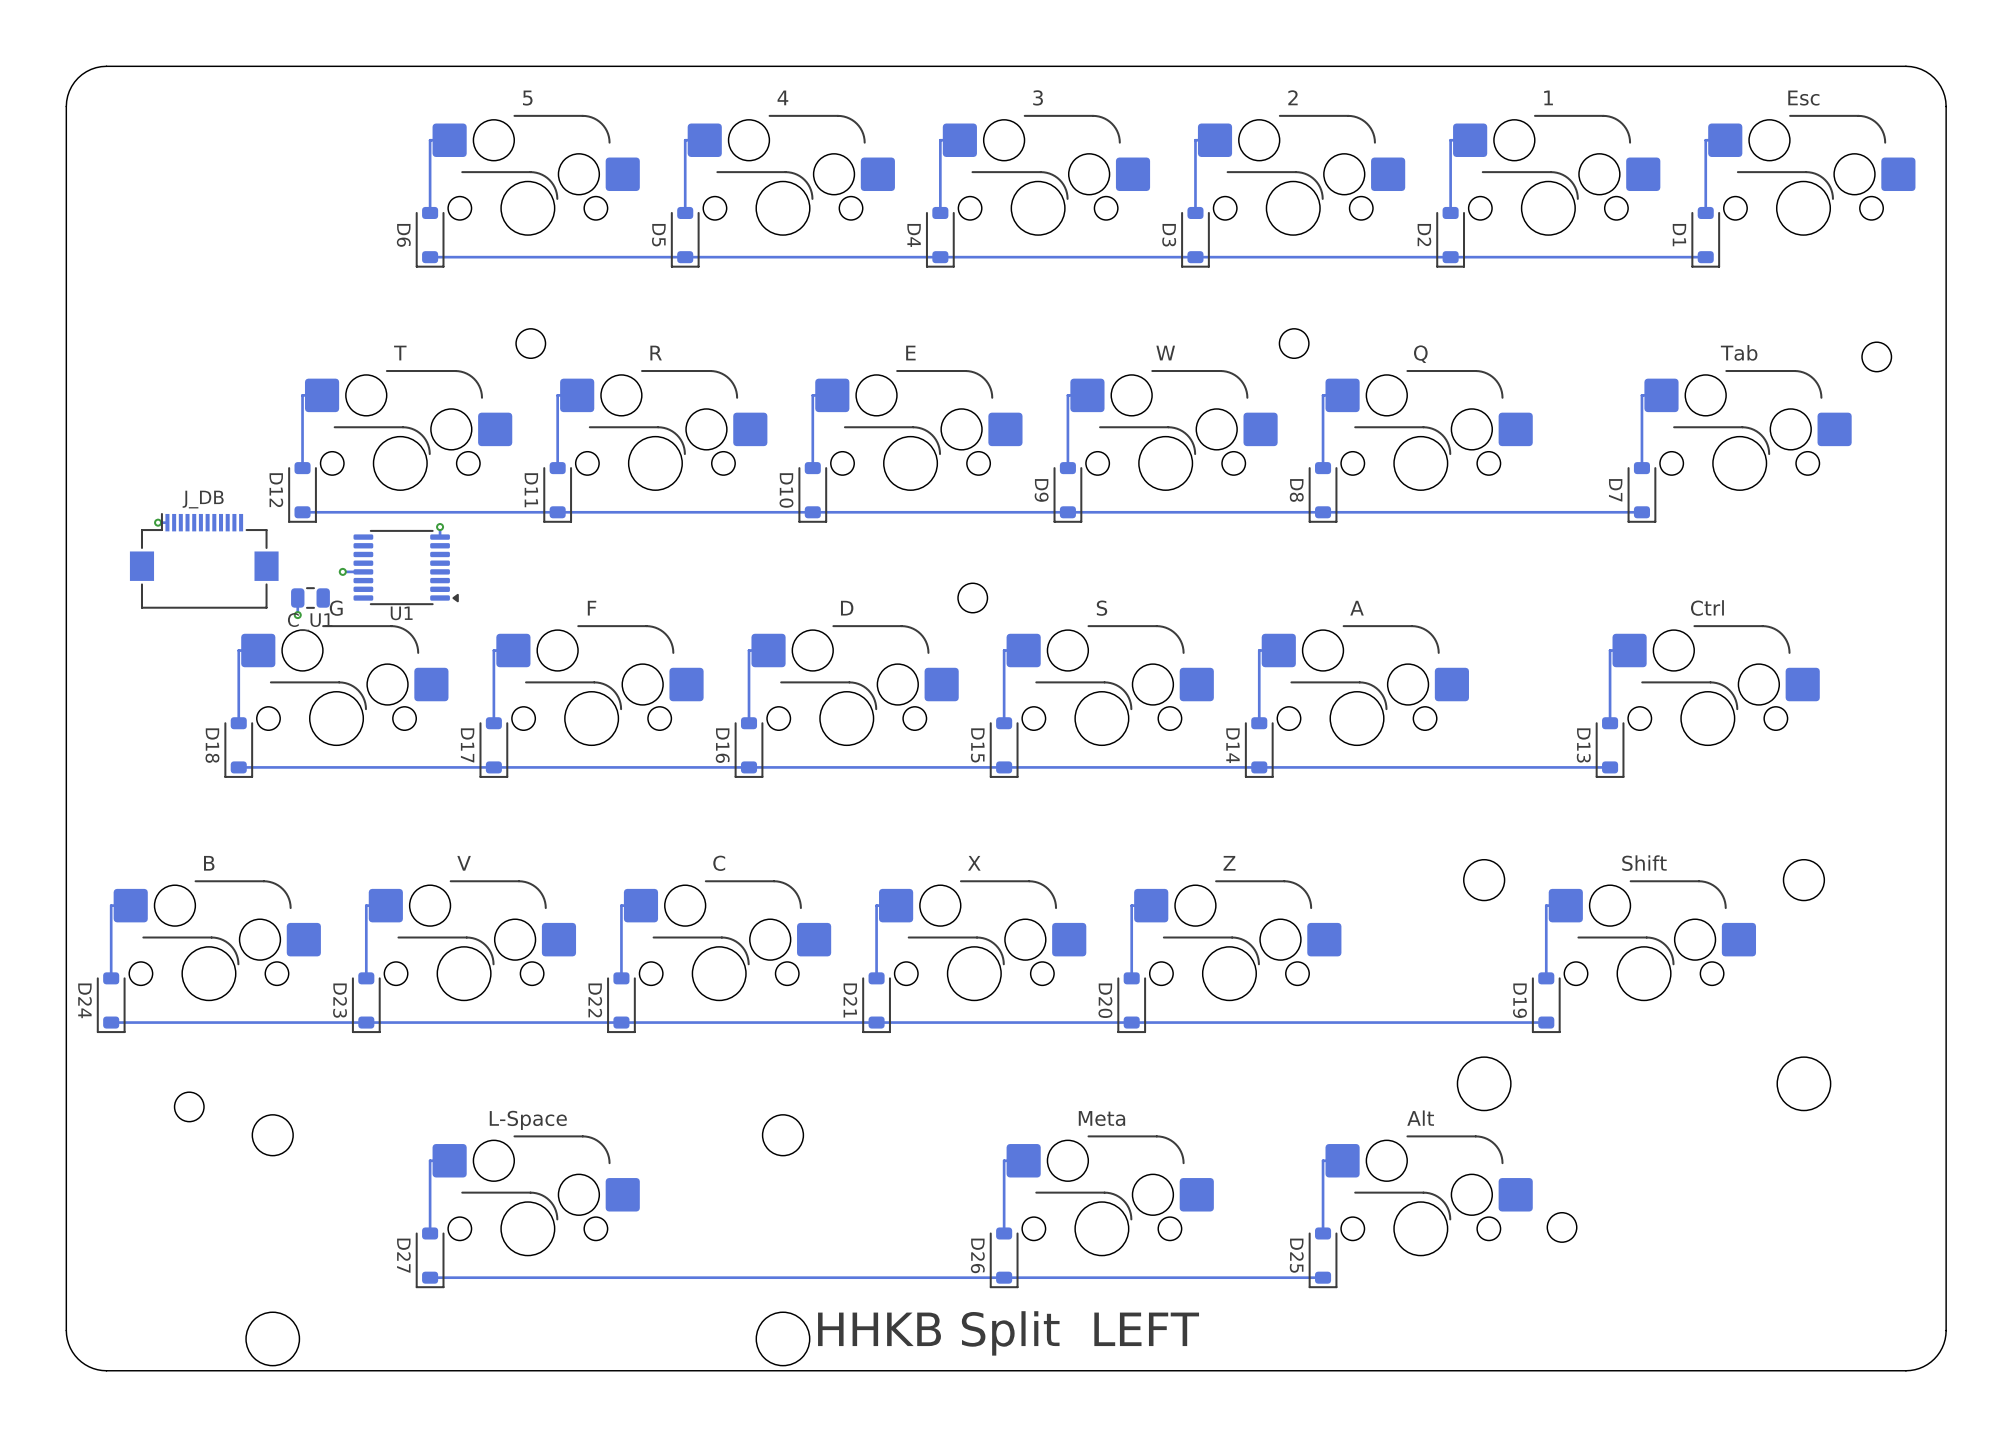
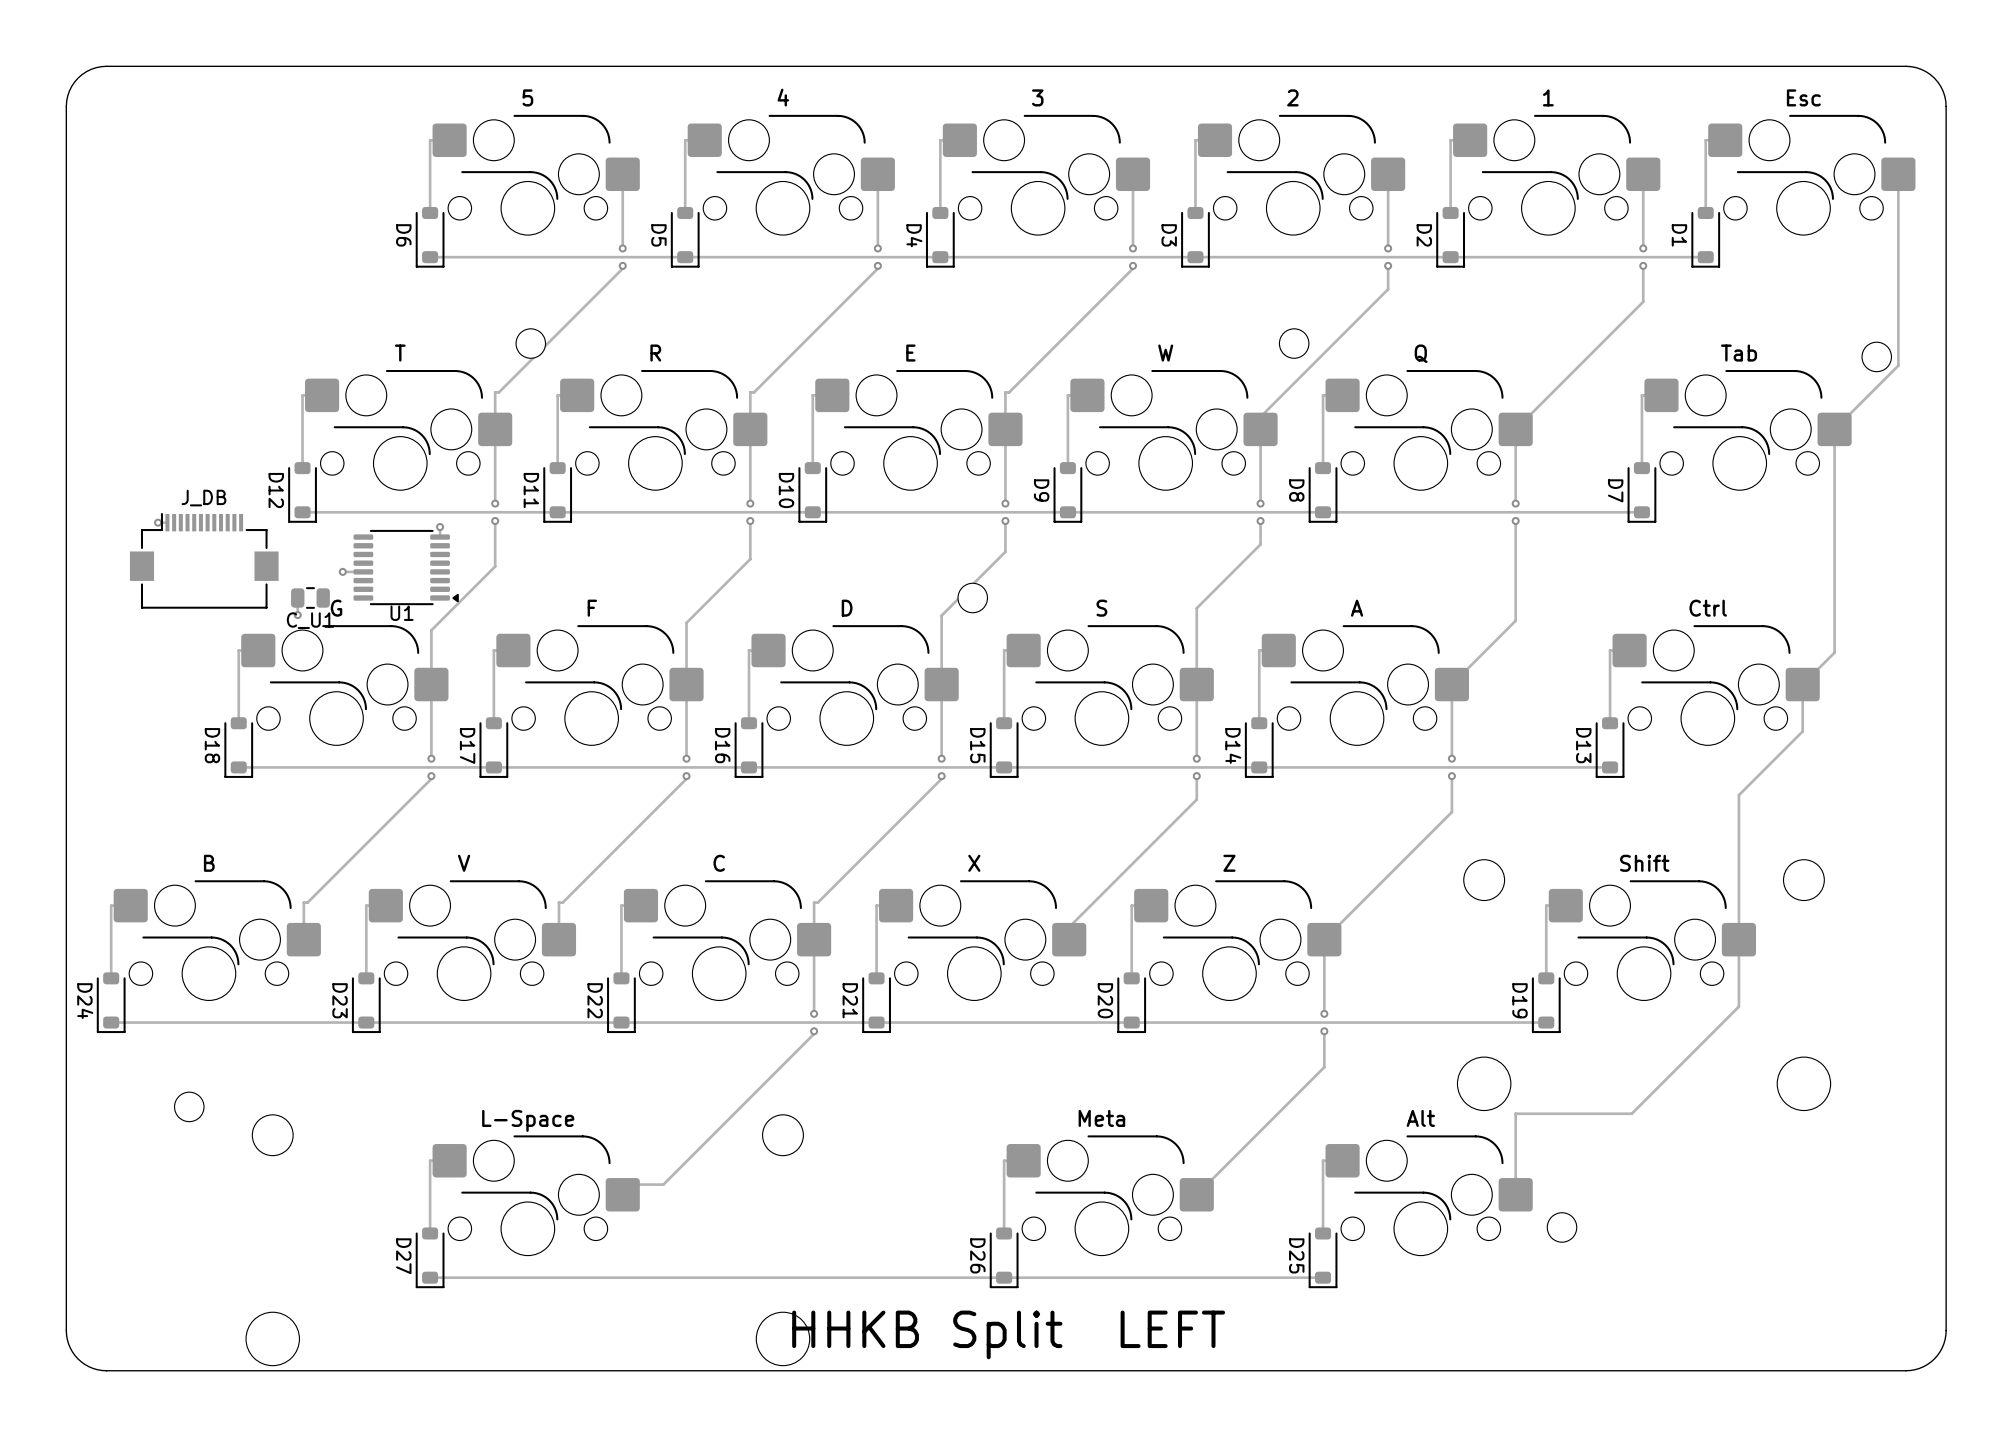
track: none -> (622, 174) (622, 248)
track: none -> (877, 174) (877, 248)
track: none -> (1133, 174) (1133, 248)
track: none -> (1388, 174) (1388, 248)
track: none -> (1643, 174) (1643, 248)
track: none -> (1898, 174) (1898, 365) (1834, 429) (1834, 652) (1802, 684) (1802, 731) (1738, 795) (1738, 1006) (1631, 1113) (1515, 1113) (1515, 1194)
via: none -> (622, 248)
via: none -> (877, 248)
via: none -> (1133, 248)
via: none -> (1388, 248)
via: none -> (1643, 248)
track: none -> (622, 265) (622, 268) (498, 392) (495, 392) (495, 503)
via: none -> (622, 265)
track: none -> (877, 265) (877, 268) (753, 392) (750, 392) (750, 503)
via: none -> (877, 265)
track: none -> (1133, 265) (1133, 268) (1009, 392) (1005, 392) (1005, 503)
via: none -> (1133, 265)
track: none -> (1388, 265) (1388, 289) (1260, 416) (1260, 503)
via: none -> (1388, 265)
track: none -> (1643, 265) (1643, 301) (1515, 429) (1515, 503)
via: none -> (1643, 265)
via: none -> (495, 503)
via: none -> (750, 503)
via: none -> (1005, 503)
via: none -> (1260, 503)
via: none -> (1515, 503)
track: none -> (495, 521) (495, 566) (431, 630) (431, 758)
via: none -> (495, 521)
track: none -> (750, 521) (750, 559) (686, 622) (686, 758)
via: none -> (750, 521)
track: none -> (1005, 521) (1005, 551) (941, 615) (941, 758)
via: none -> (1005, 521)
track: none -> (1260, 521) (1260, 544) (1196, 608) (1196, 758)
via: none -> (1260, 521)
track: none -> (1515, 521) (1515, 620) (1451, 684) (1451, 758)
via: none -> (1515, 521)
via: none -> (431, 758)
via: none -> (686, 758)
via: none -> (941, 758)
via: none -> (1196, 758)
via: none -> (1451, 758)
track: none -> (431, 776) (431, 778) (307, 902) (303, 902) (303, 939)
via: none -> (431, 776)
track: none -> (686, 776) (686, 778) (562, 902) (558, 902) (558, 939)
via: none -> (686, 776)
track: none -> (941, 776) (941, 778) (817, 902) (814, 902) (814, 1013)
via: none -> (941, 776)
track: none -> (1196, 776) (1196, 799) (1069, 927) (1069, 939)
via: none -> (1196, 776)
track: none -> (1451, 776) (1451, 812) (1324, 939) (1324, 1013)
via: none -> (1451, 776)
via: none -> (814, 1013)
via: none -> (1324, 1013)
track: none -> (814, 1031) (814, 1033) (663, 1184) (622, 1184) (622, 1194)
via: none -> (814, 1031)
track: none -> (1324, 1031) (1324, 1067) (1196, 1194)
via: none -> (1324, 1031)

